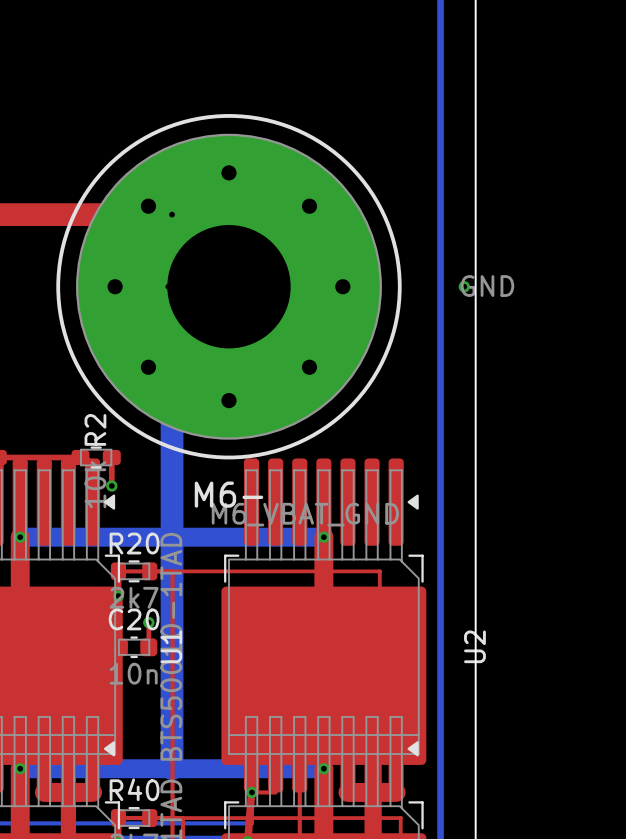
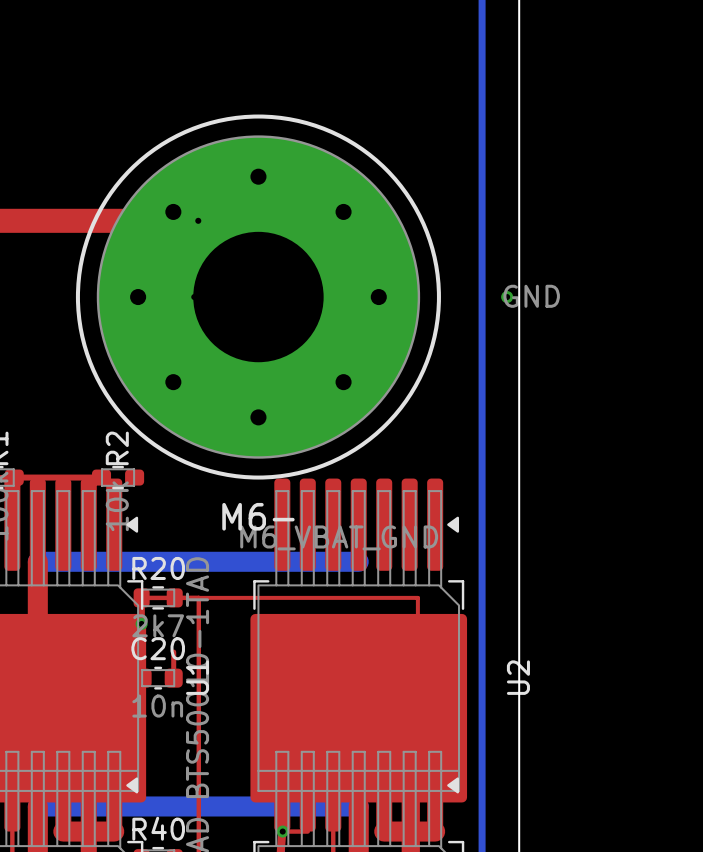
bottom track: (172, 214) (172, 768) -> none
top track: (111, 457) (111, 485) -> none
via: (111, 485) -> none
via: (20, 537) -> none
top track: (323, 537) (323, 618) -> none
via: (323, 537) -> none
via: (148, 622) -> none
via: (20, 768) -> none
via: (323, 768) -> none

